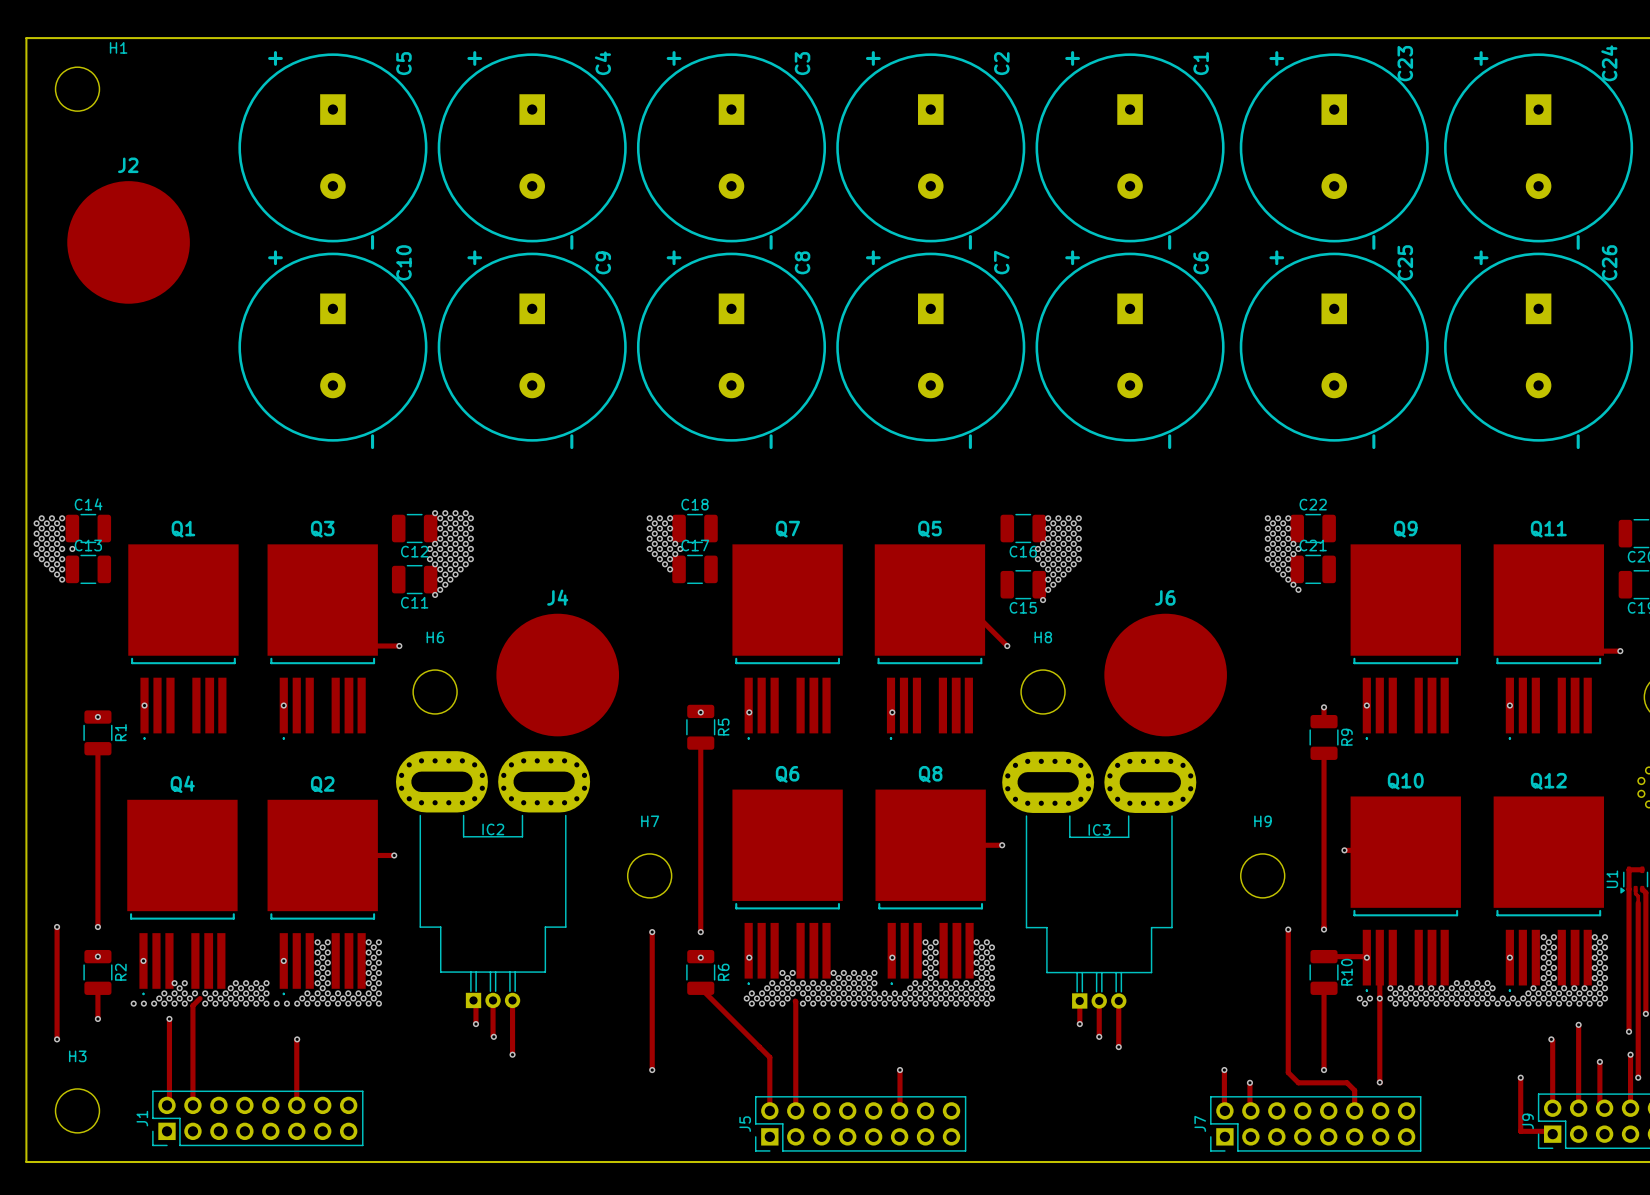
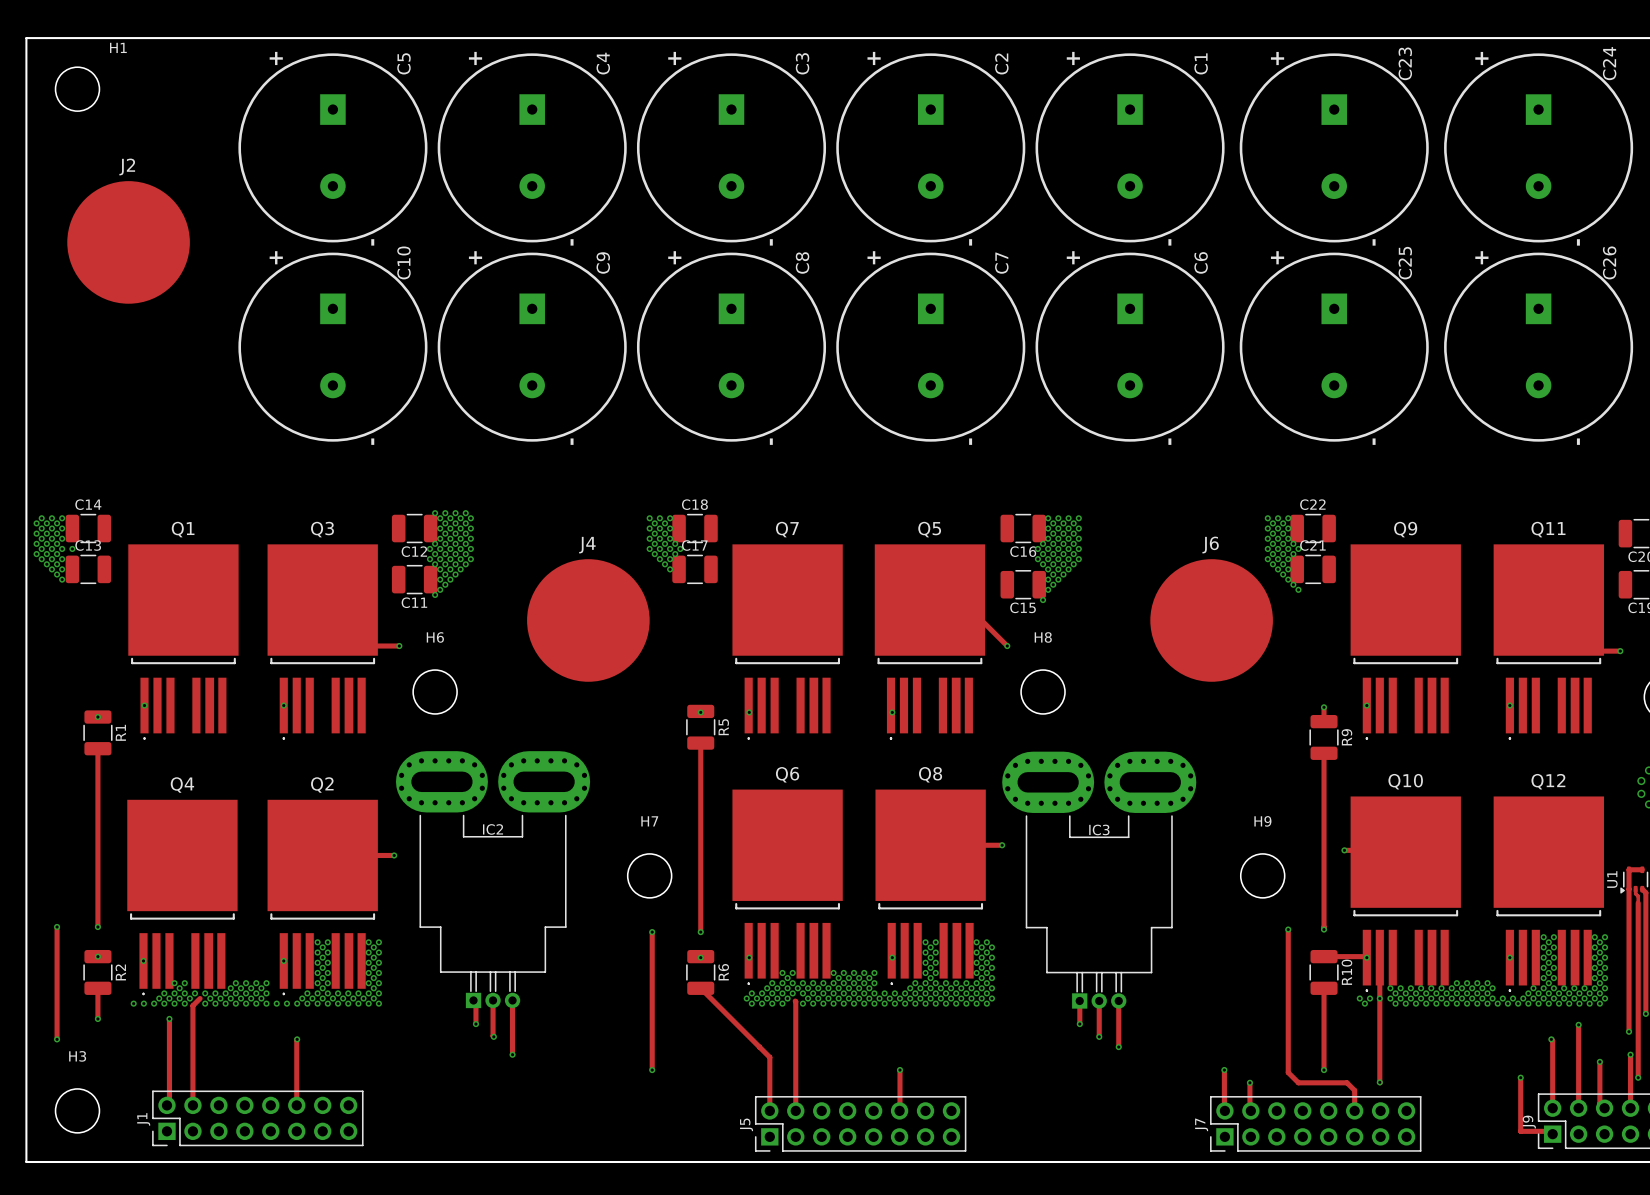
J4 position: (557, 675) -> (588, 620)
J6 position: (1165, 675) -> (1211, 620)

